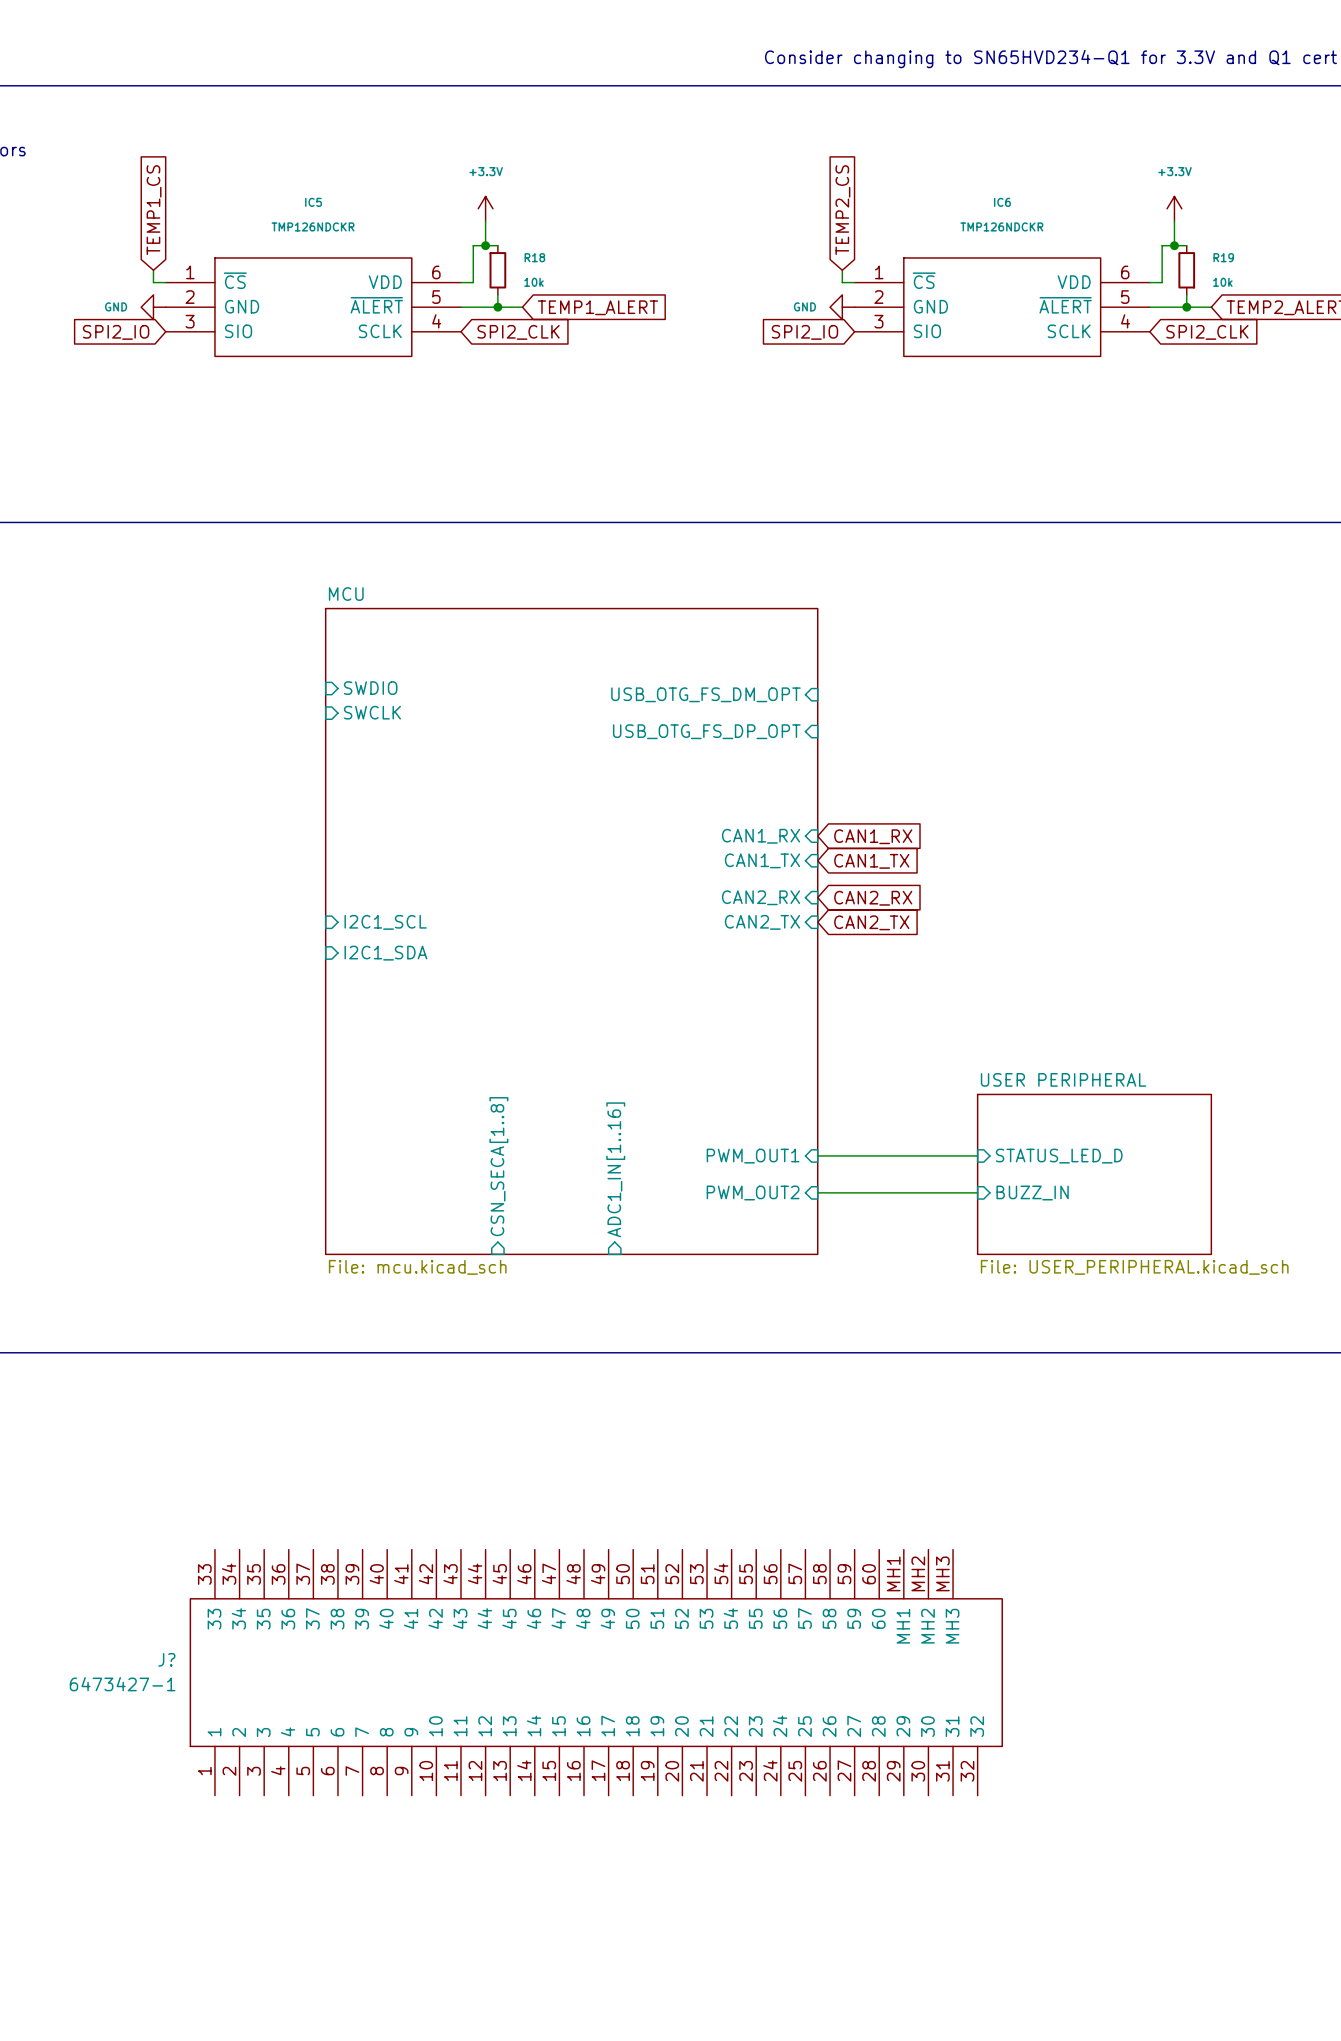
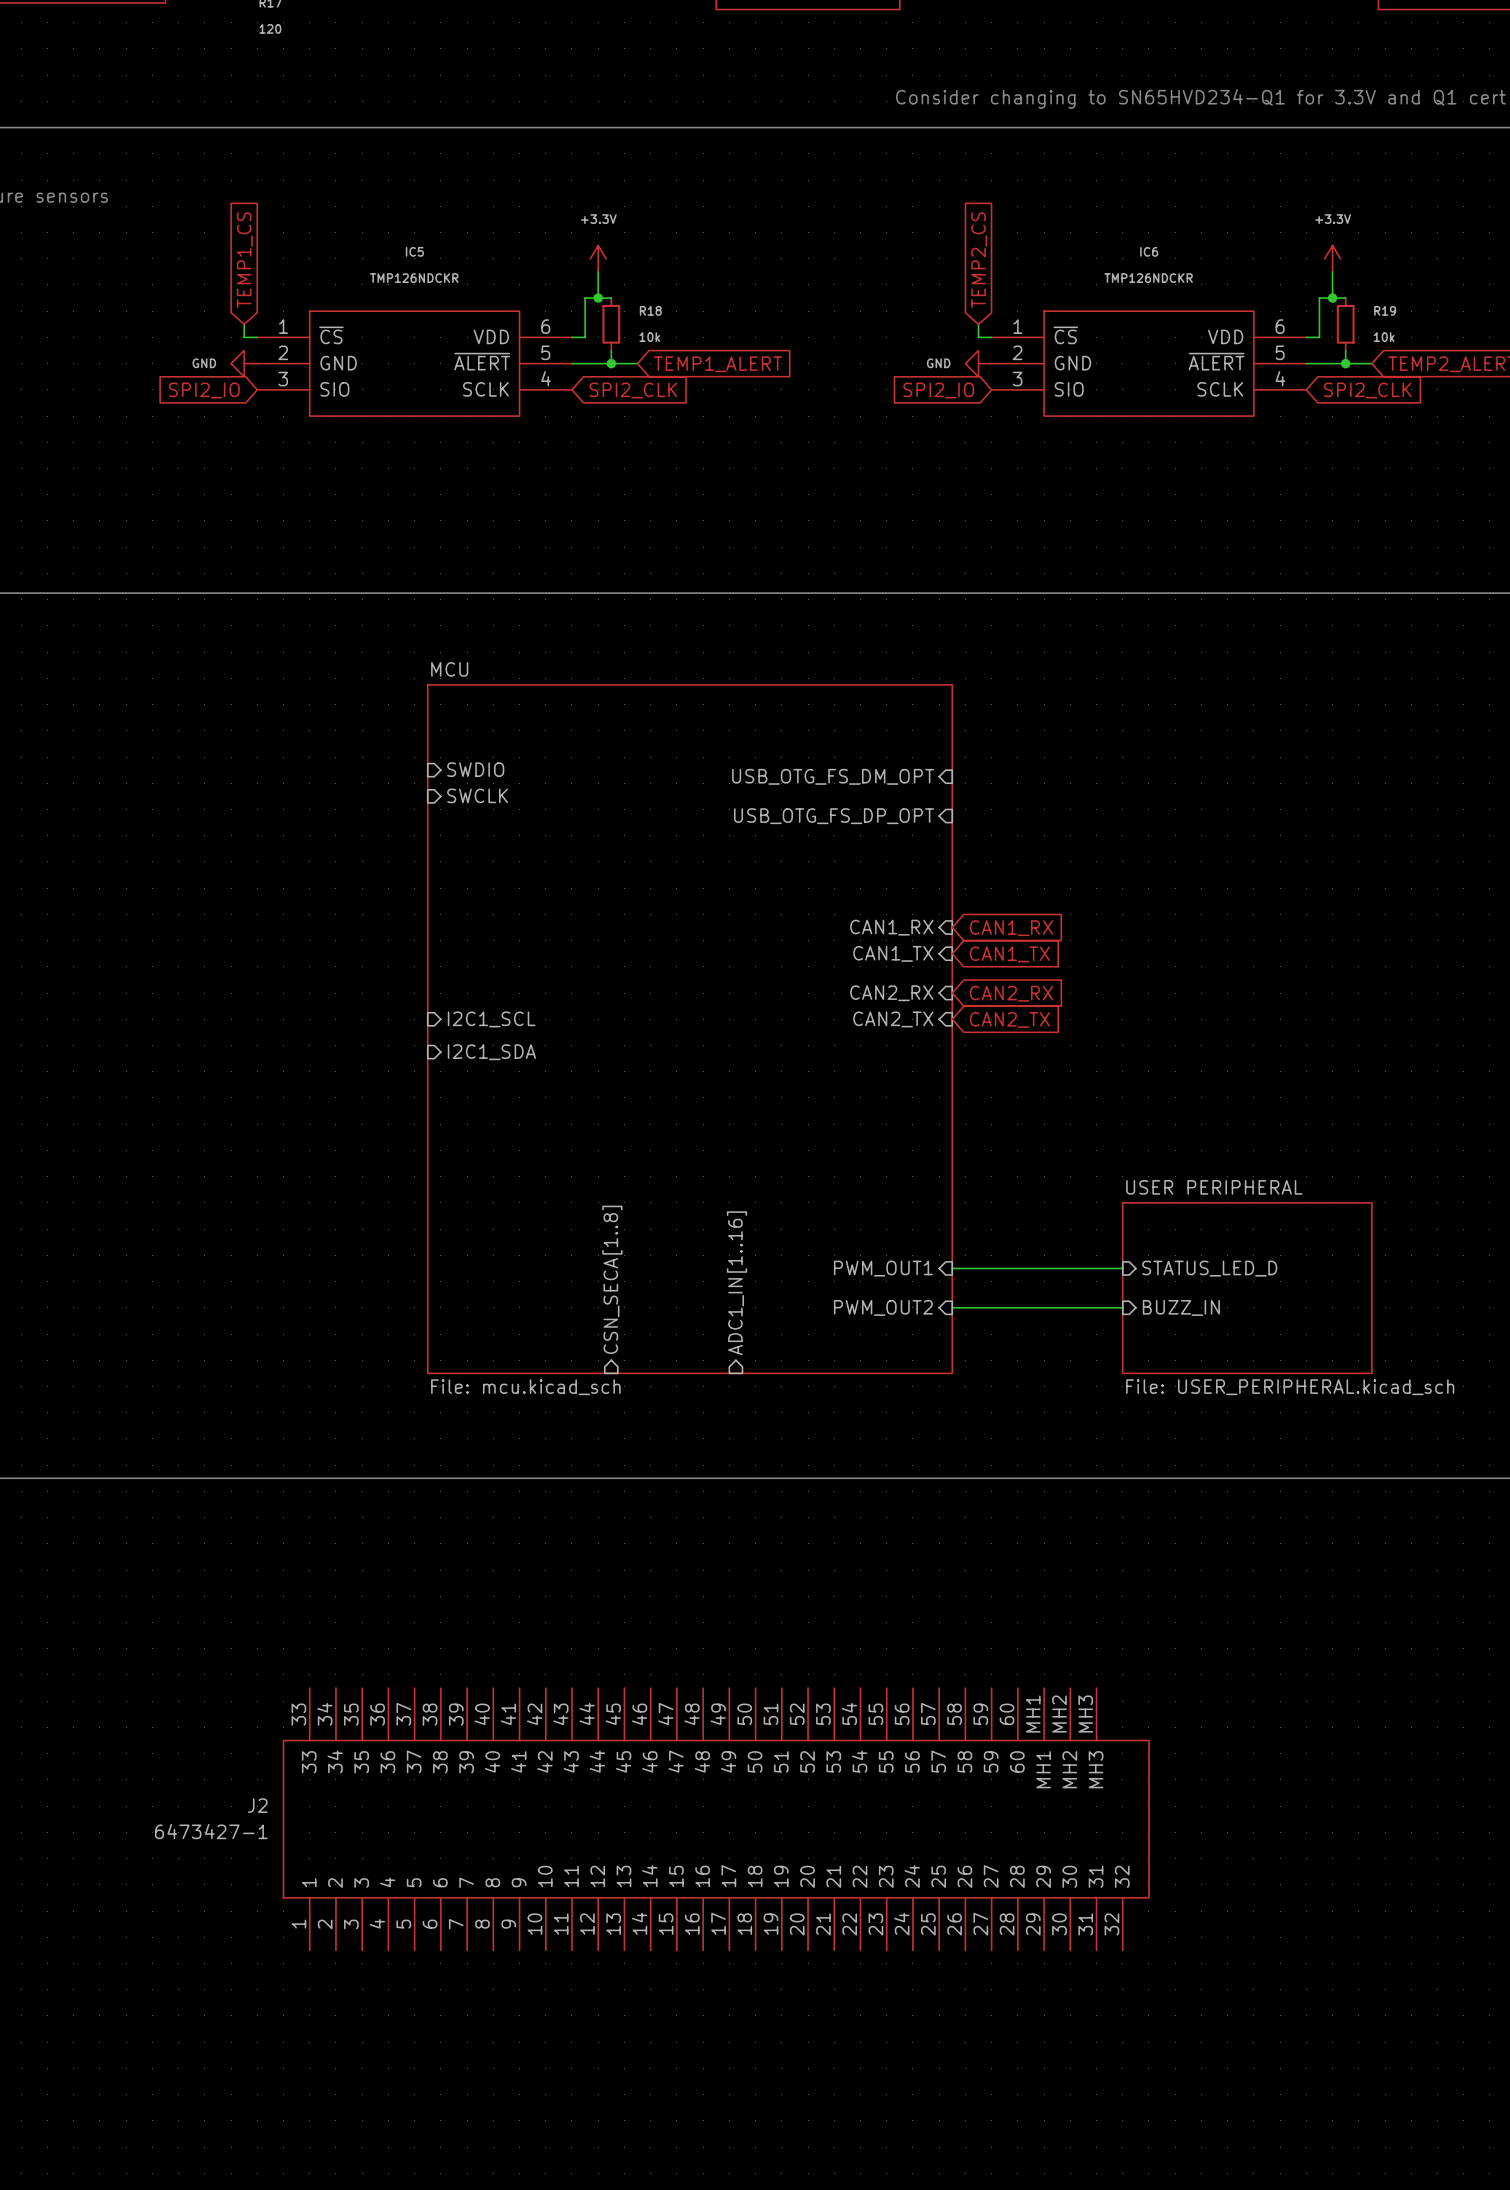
J? name: J? (166, 1659) -> J2 (257, 1805)

